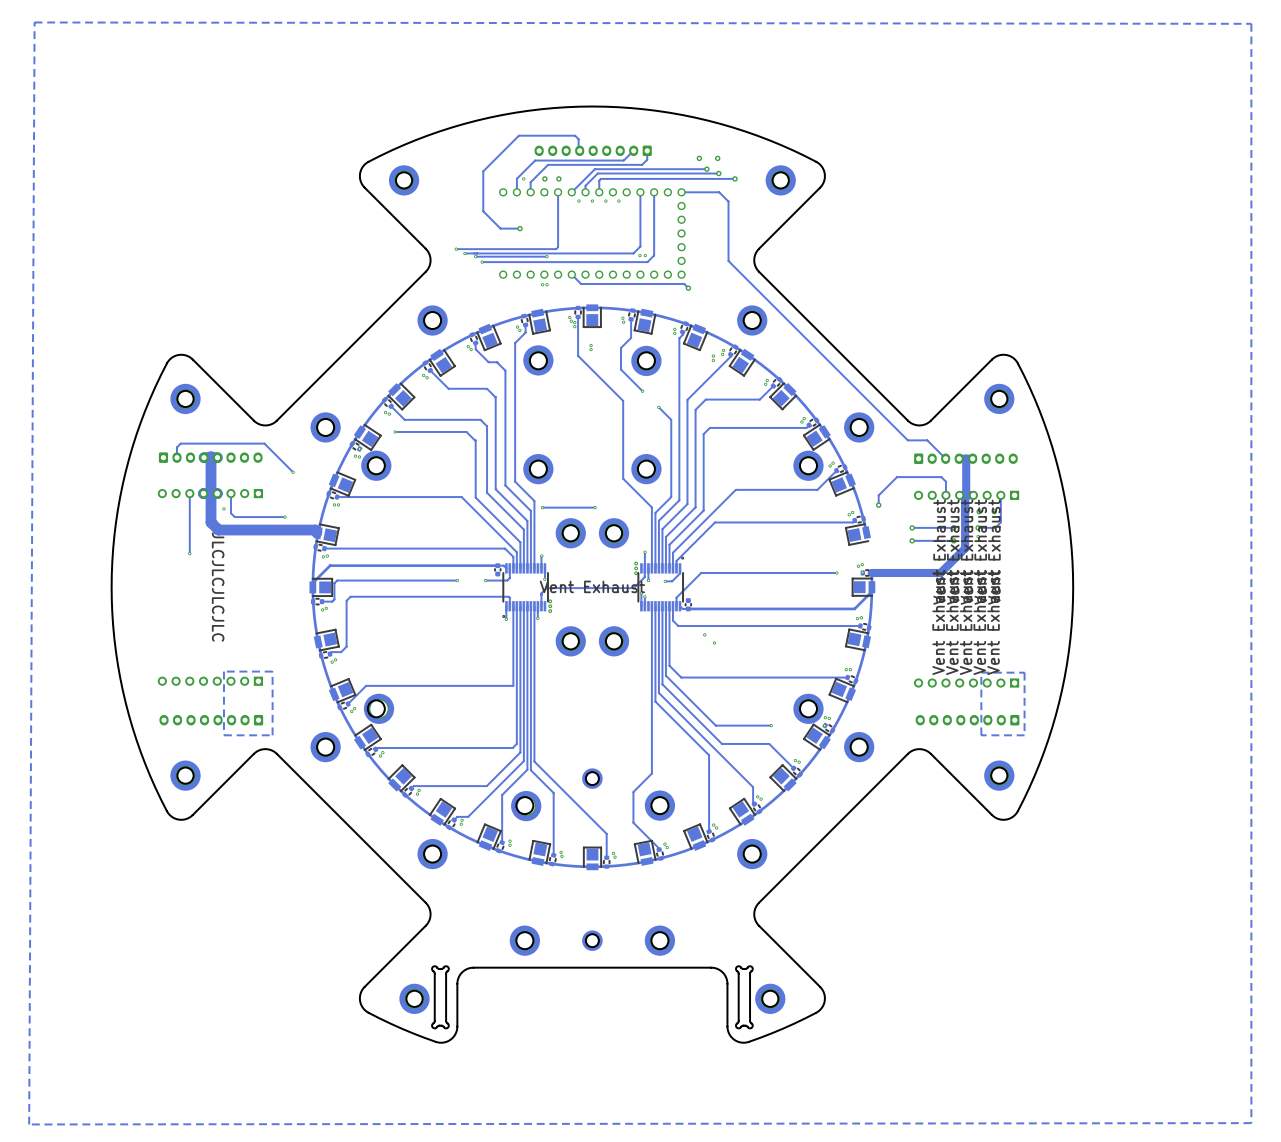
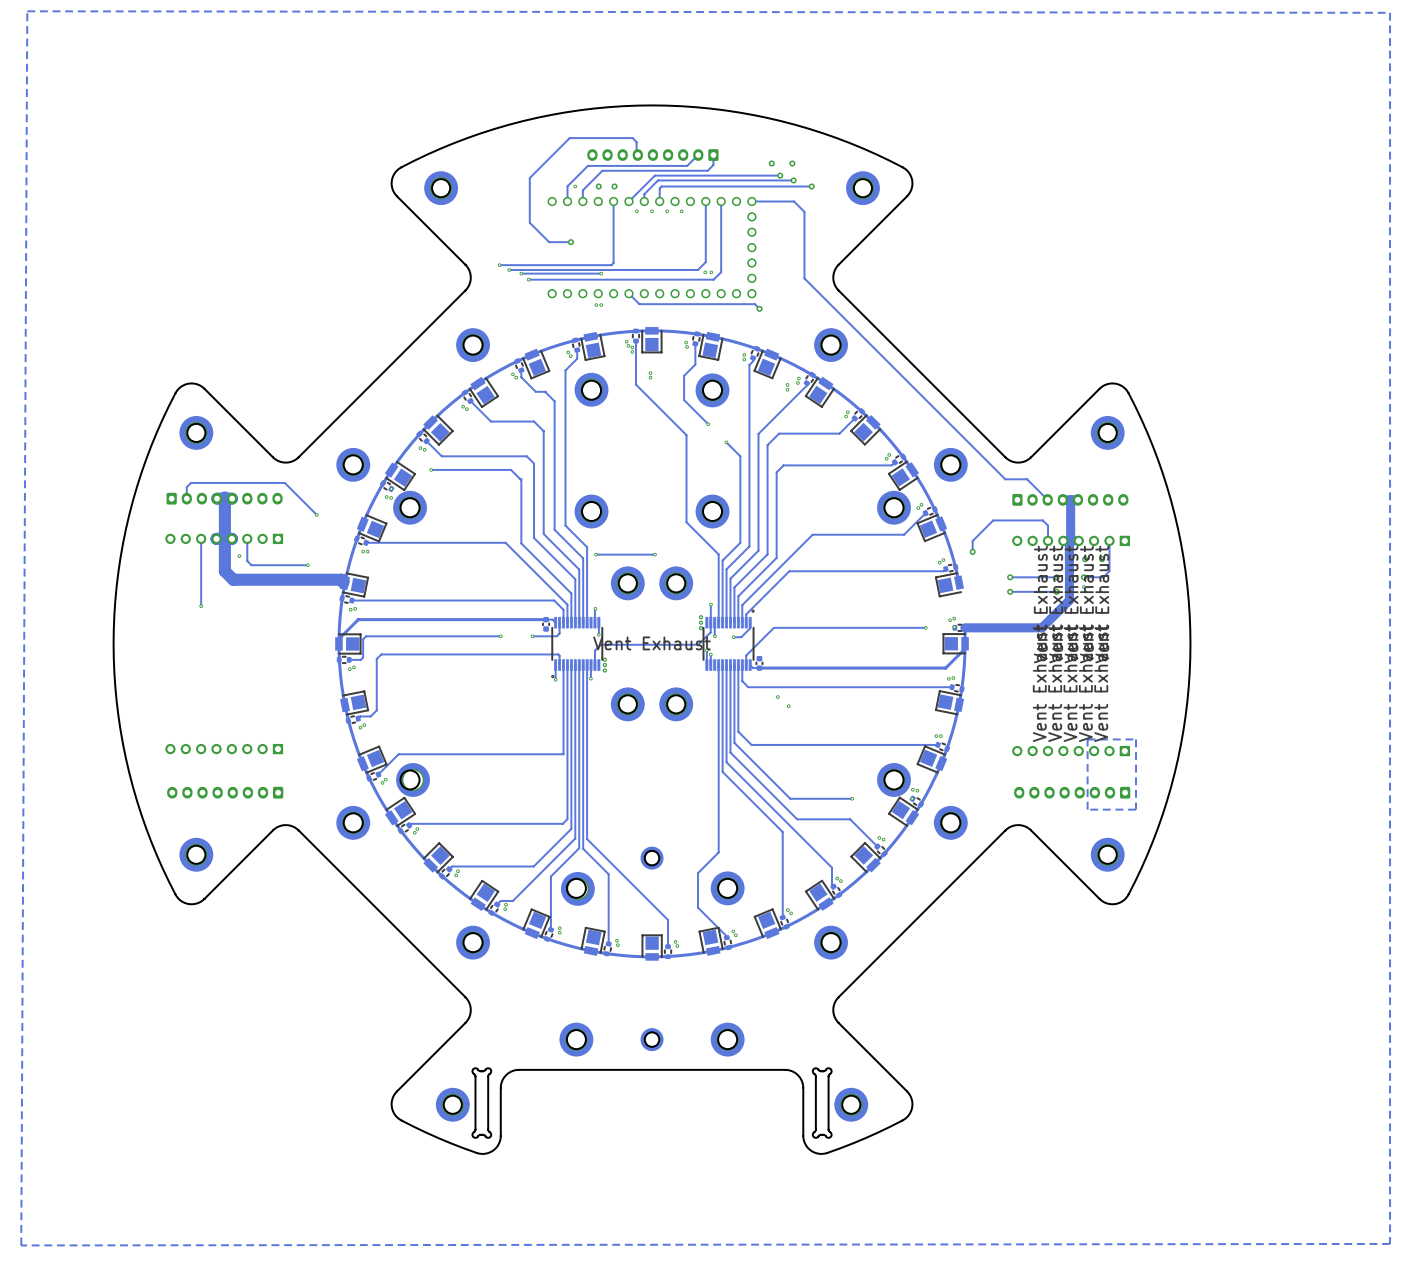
text: JLCJLCJLCJLC (218, 587) -> none
zone outline: (272, 671) (272, 735) (223, 735) (223, 671) (272, 671) -> none

